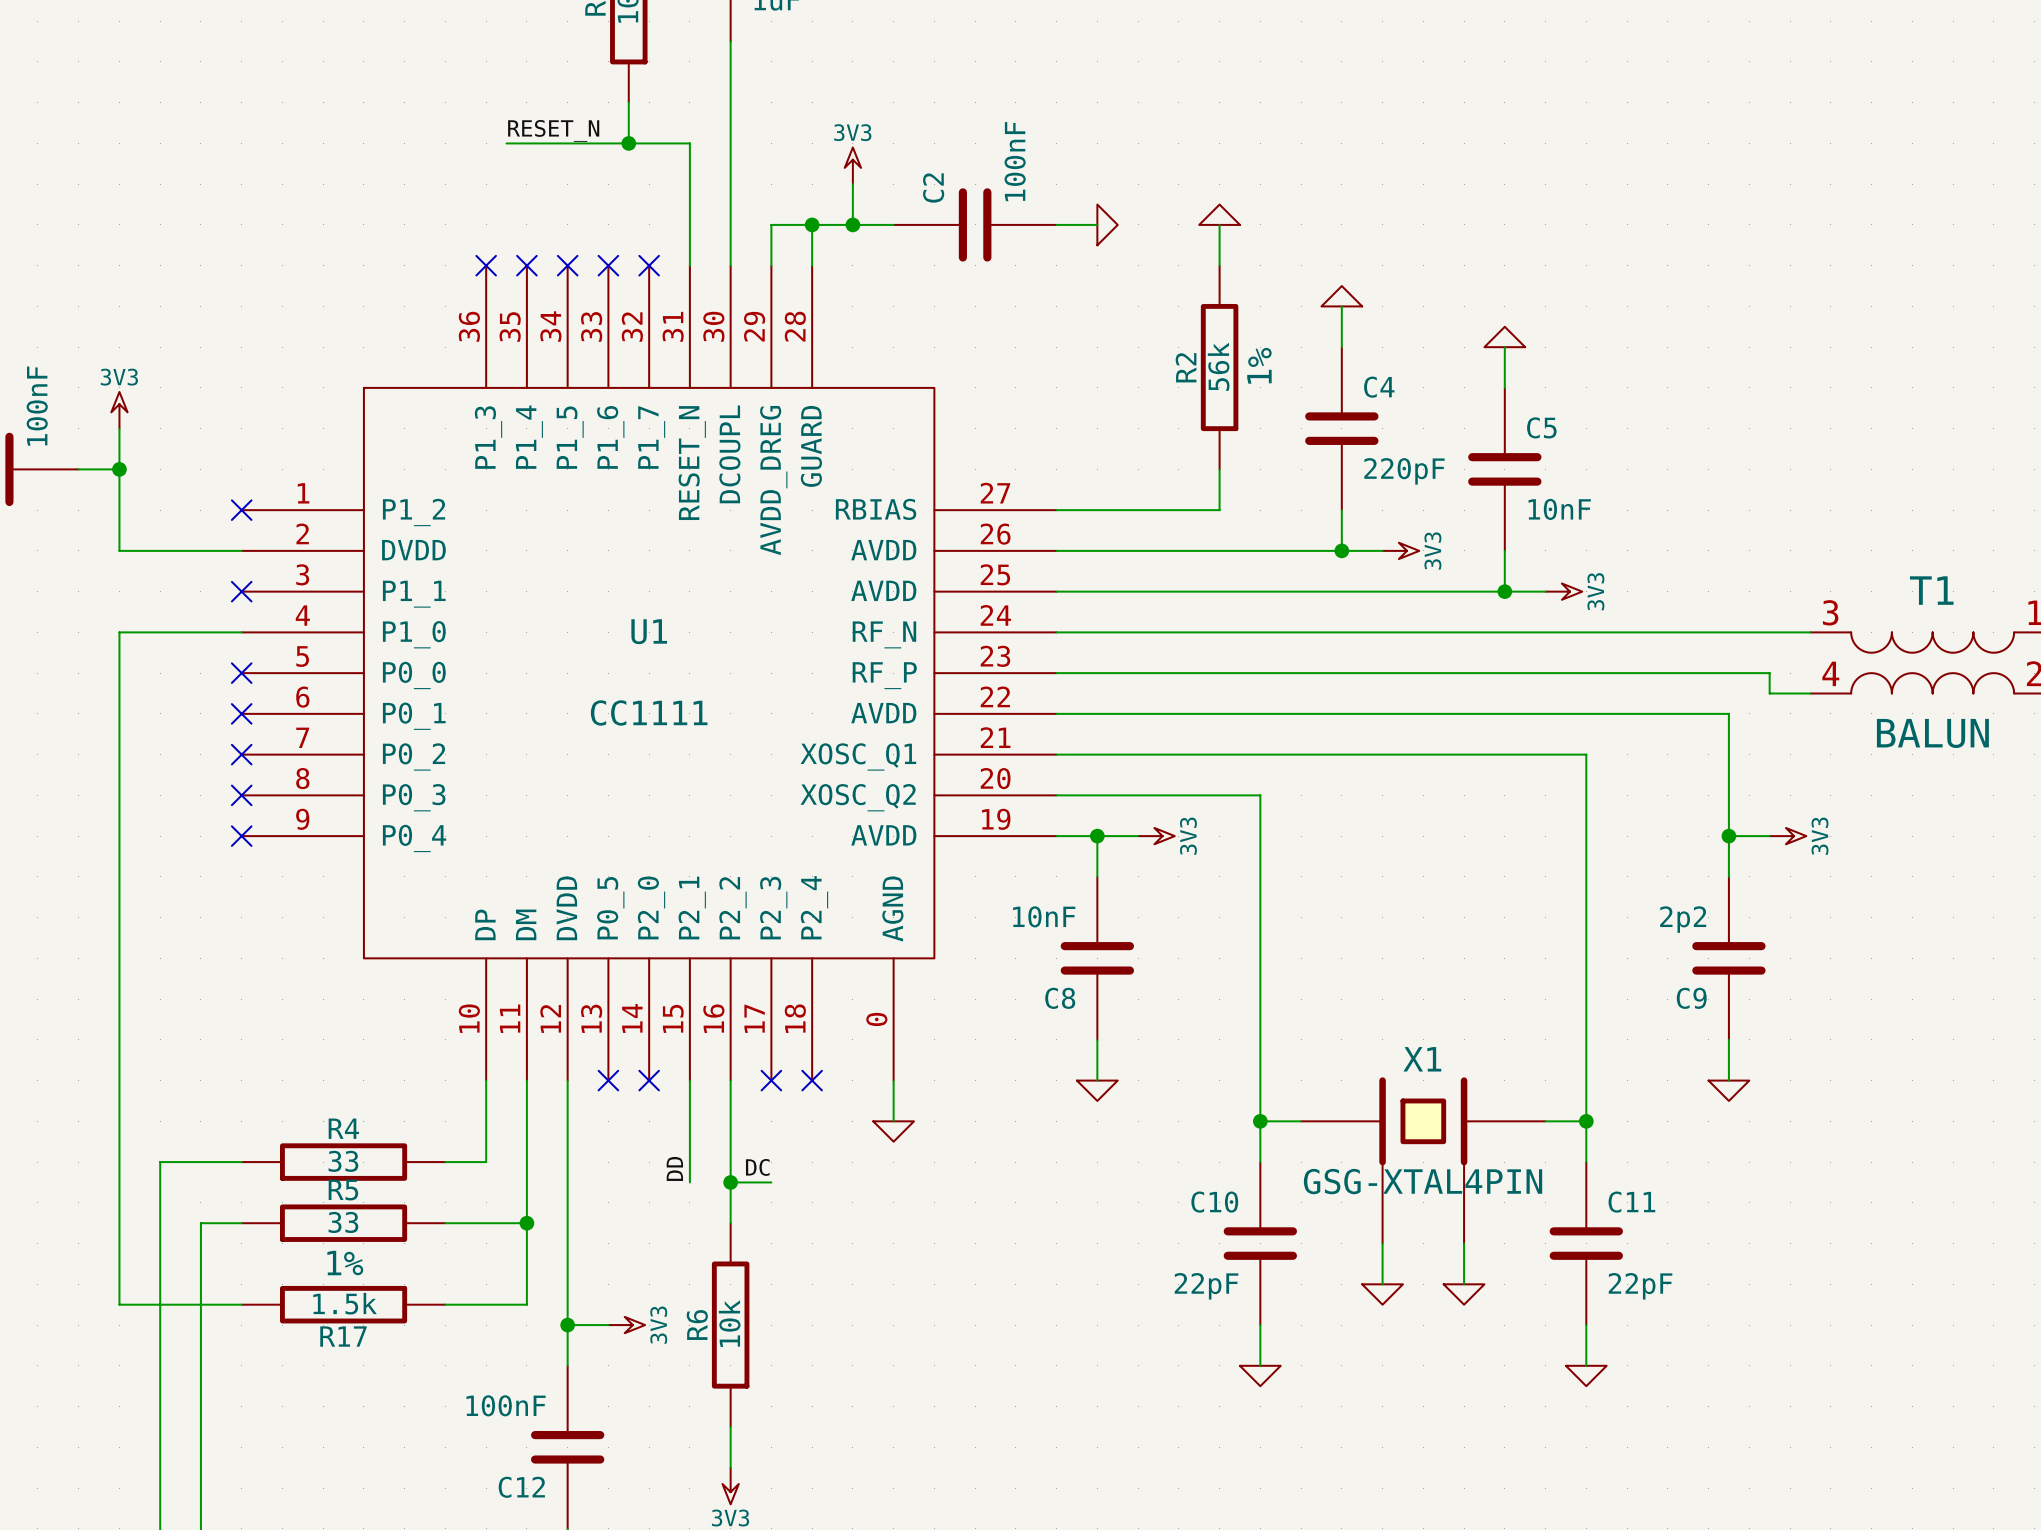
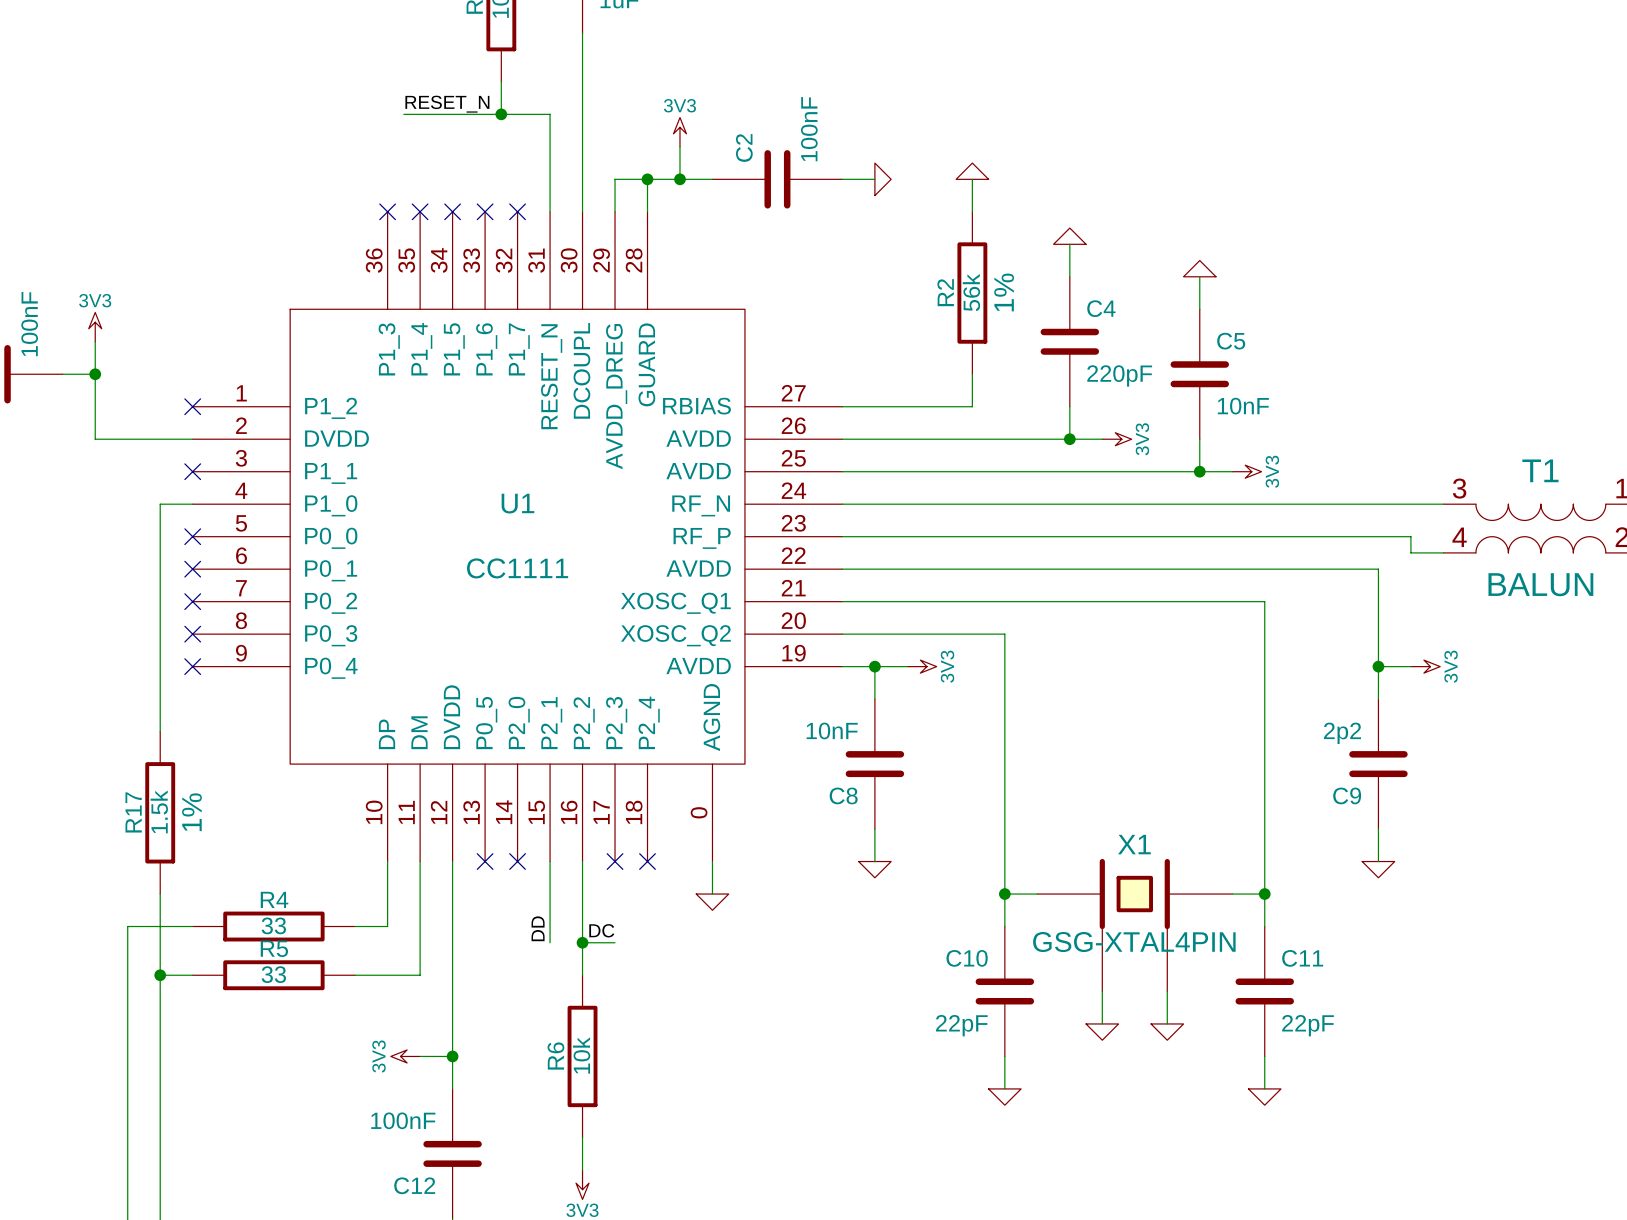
wire: (200, 632) (119, 632) (119, 1304) (241, 1304) -> (160, 504) (160, 731)
wire: none -> (160, 894) (160, 975)
junction: none -> (160, 975)
wire: (526, 1223) (526, 1304) (445, 1304) -> none
junction: (526, 1223) -> none
R17 rotation: 0° (343, 1304) -> 90° clockwise (160, 812)
R17 position: (343, 1304) -> (160, 812)
wire: (567, 1325) (608, 1325) -> (452, 1056) (420, 1056)
power symbol rotation: 0° (626, 1325) -> 180° (405, 1056)
power symbol position: 3V3 (626, 1325) -> 3V3 (405, 1056)

